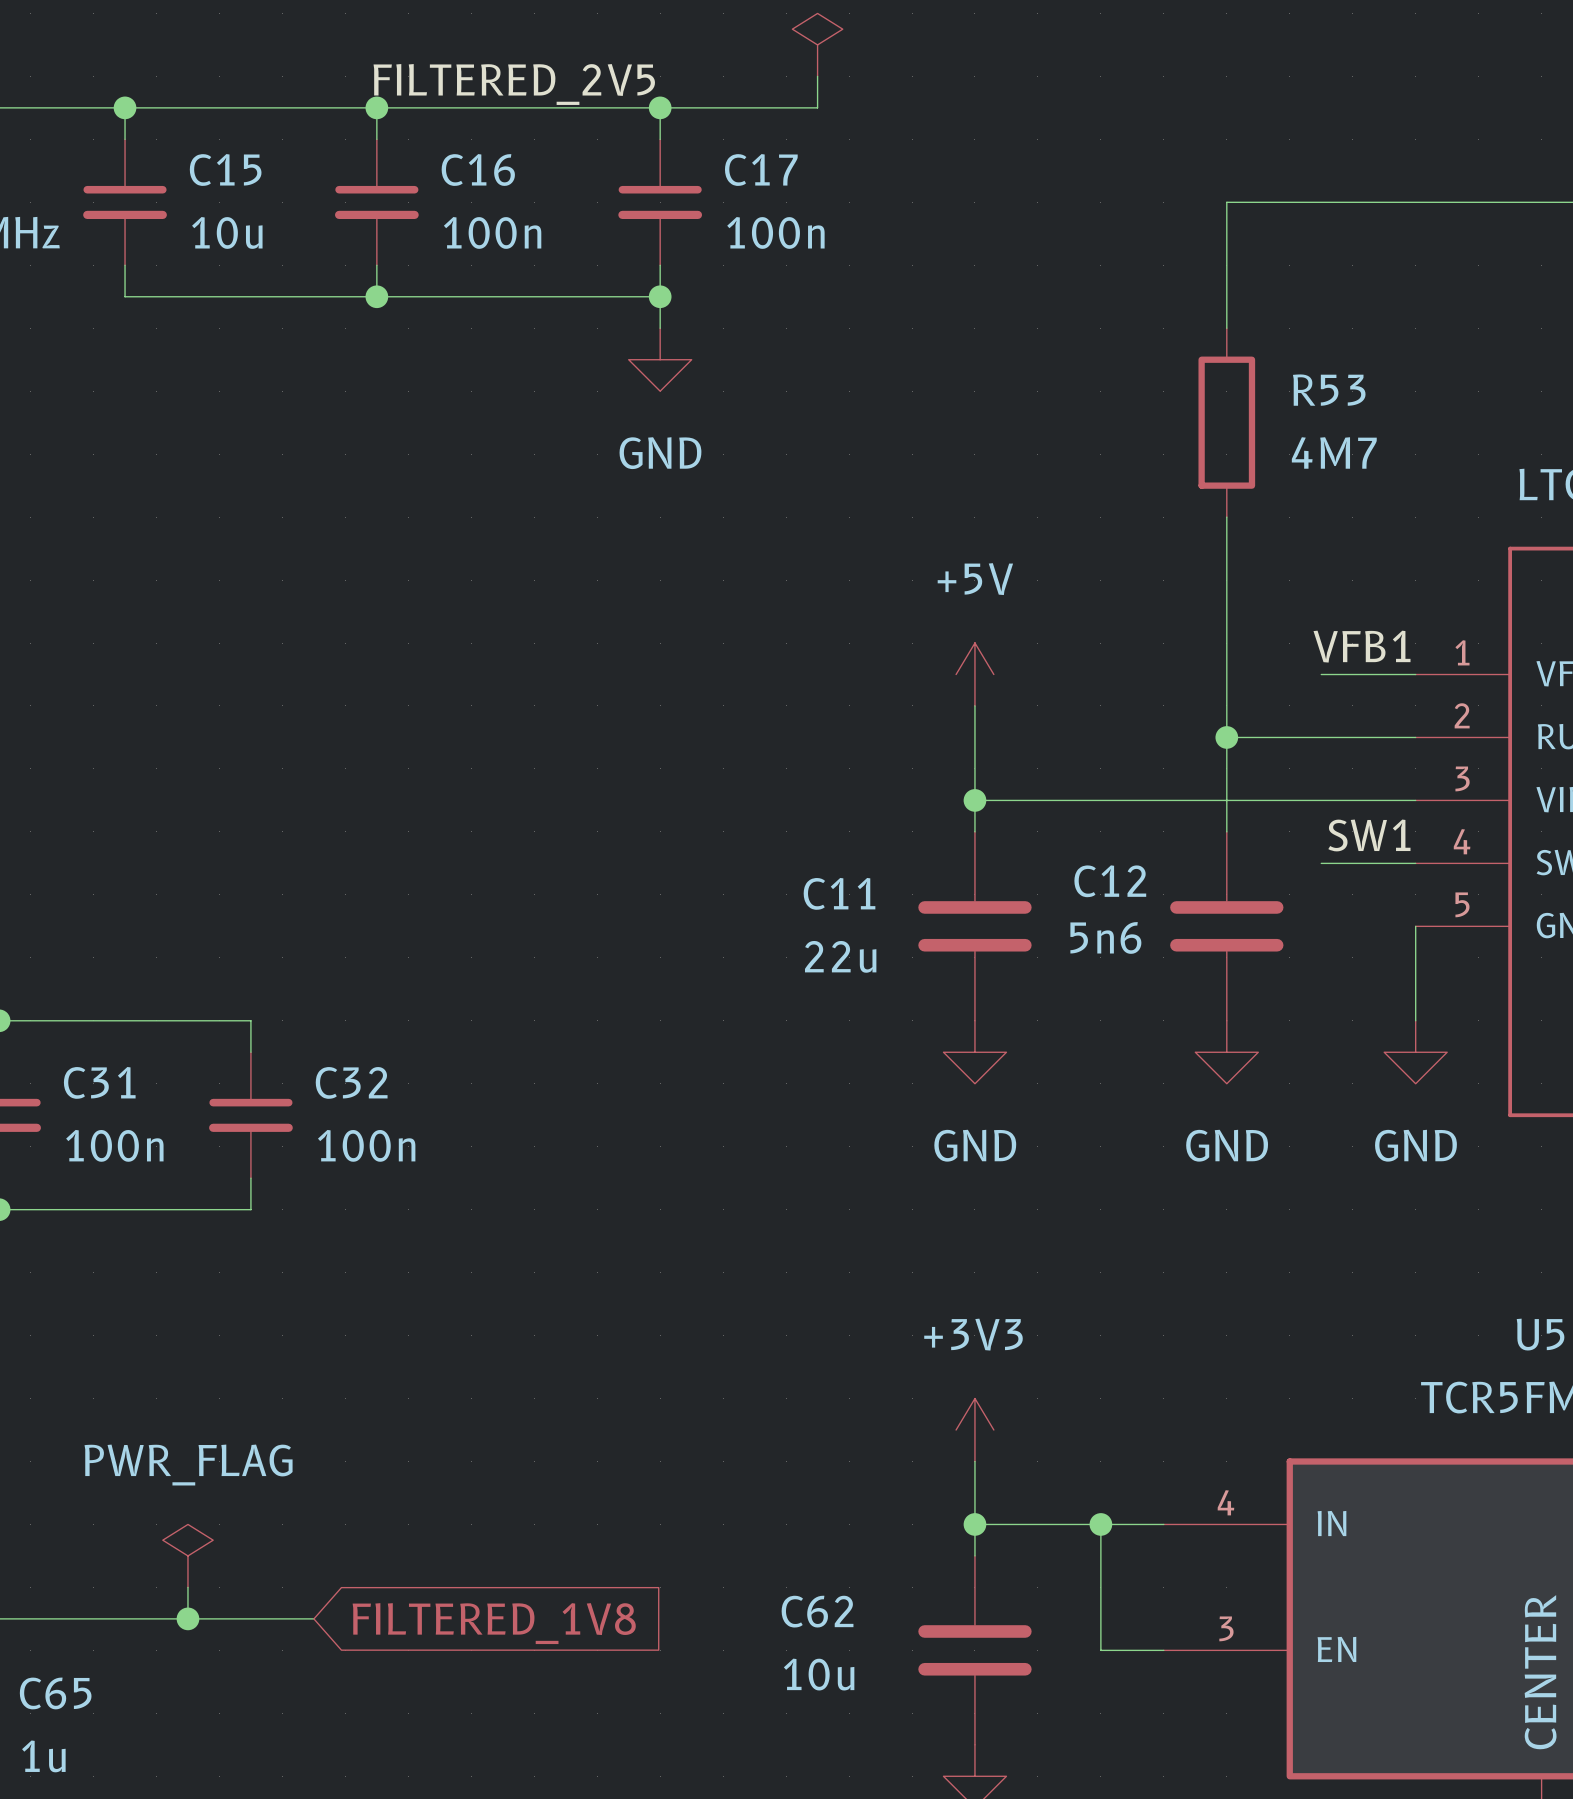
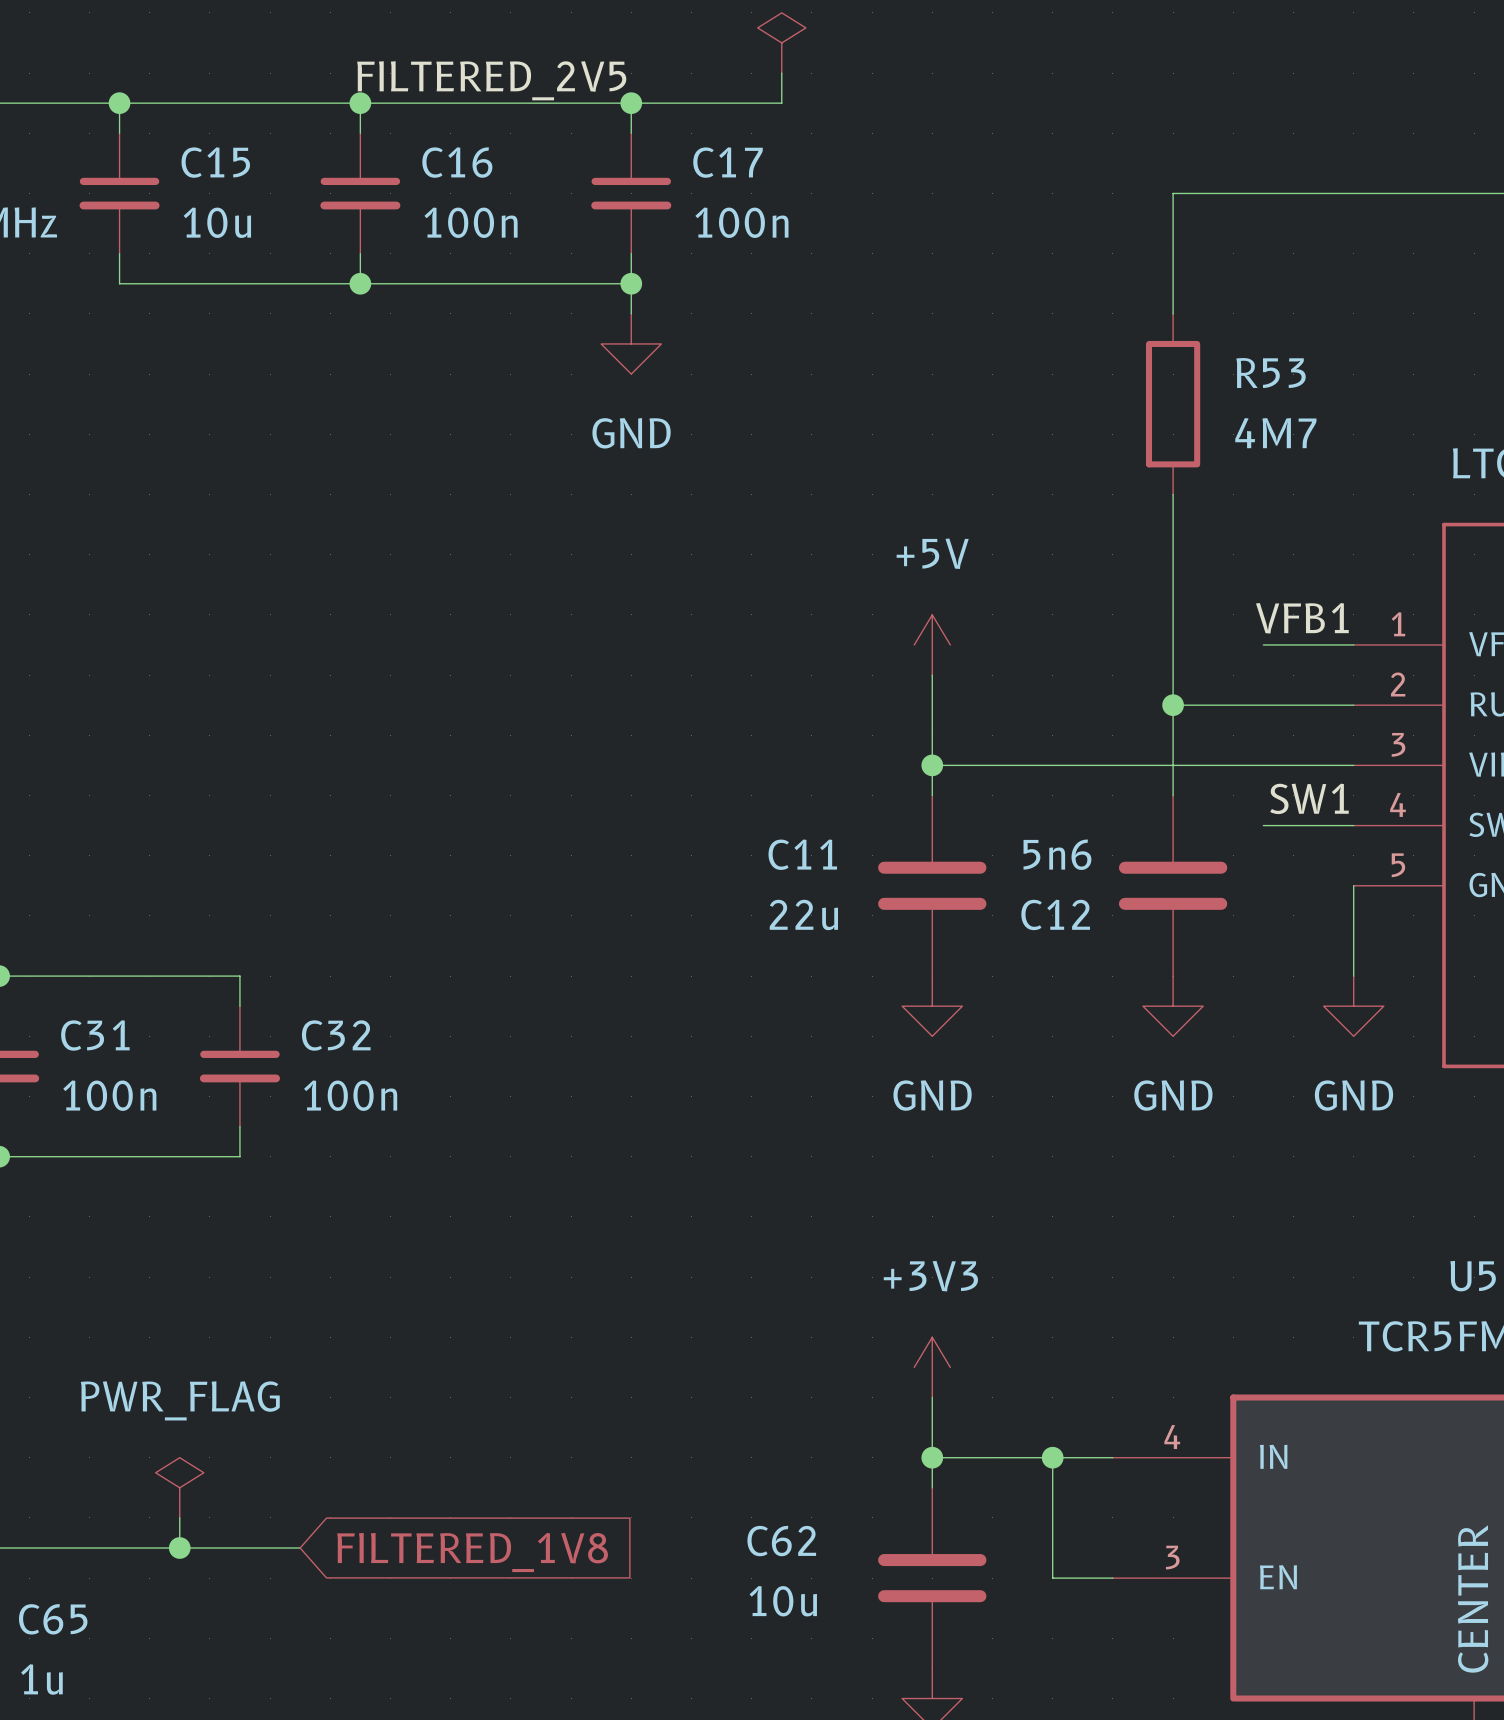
C12 name position: C12 (1110, 881) -> C12 (1055, 914)
C12 value position: 5n6 (1105, 937) -> 5n6 (1057, 854)

